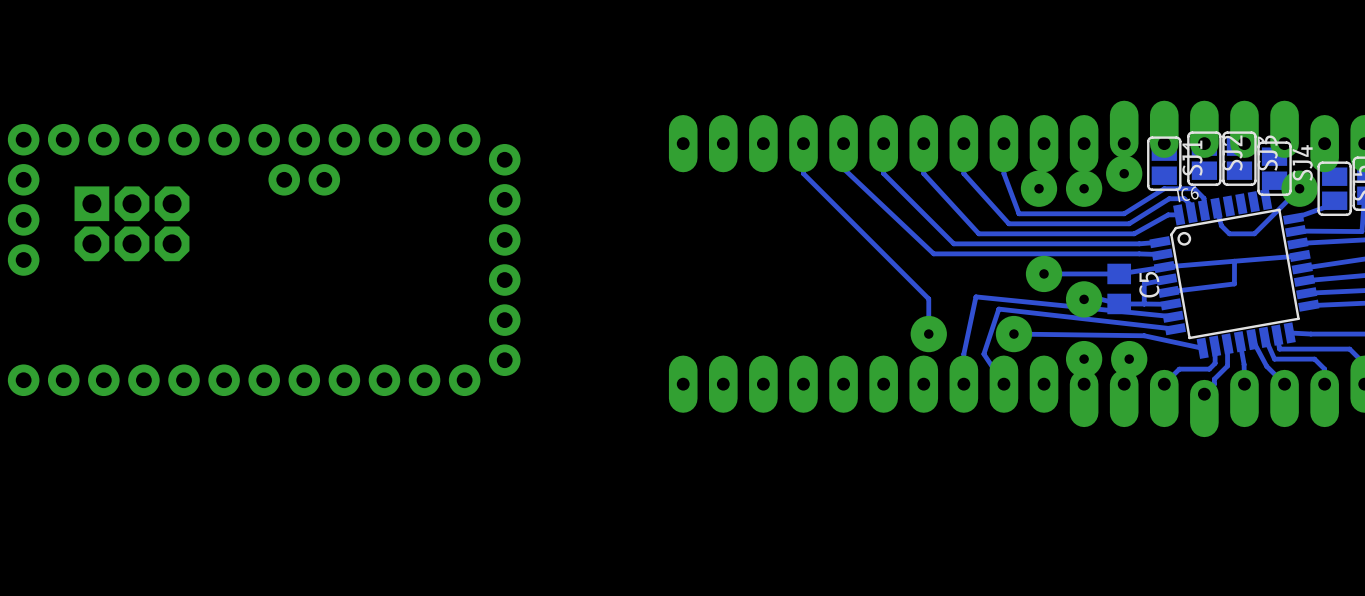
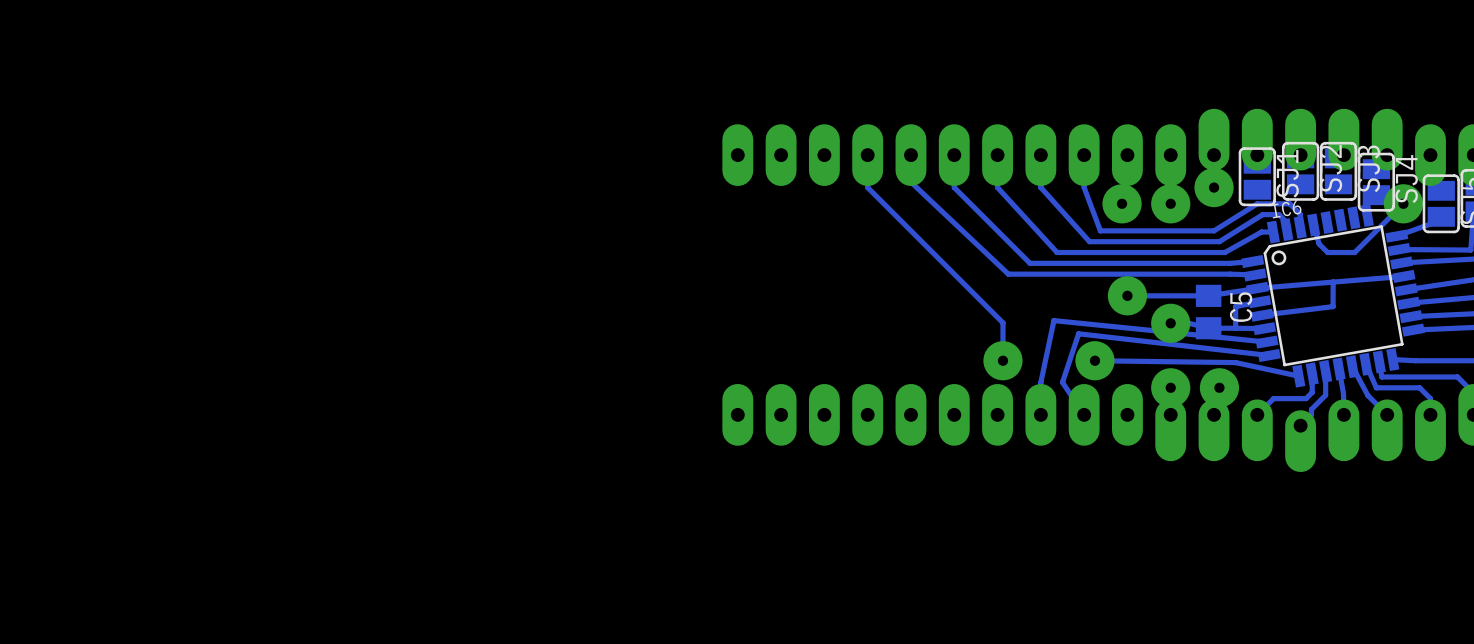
part: (132, 223) -> none
part: (264, 259) -> none

